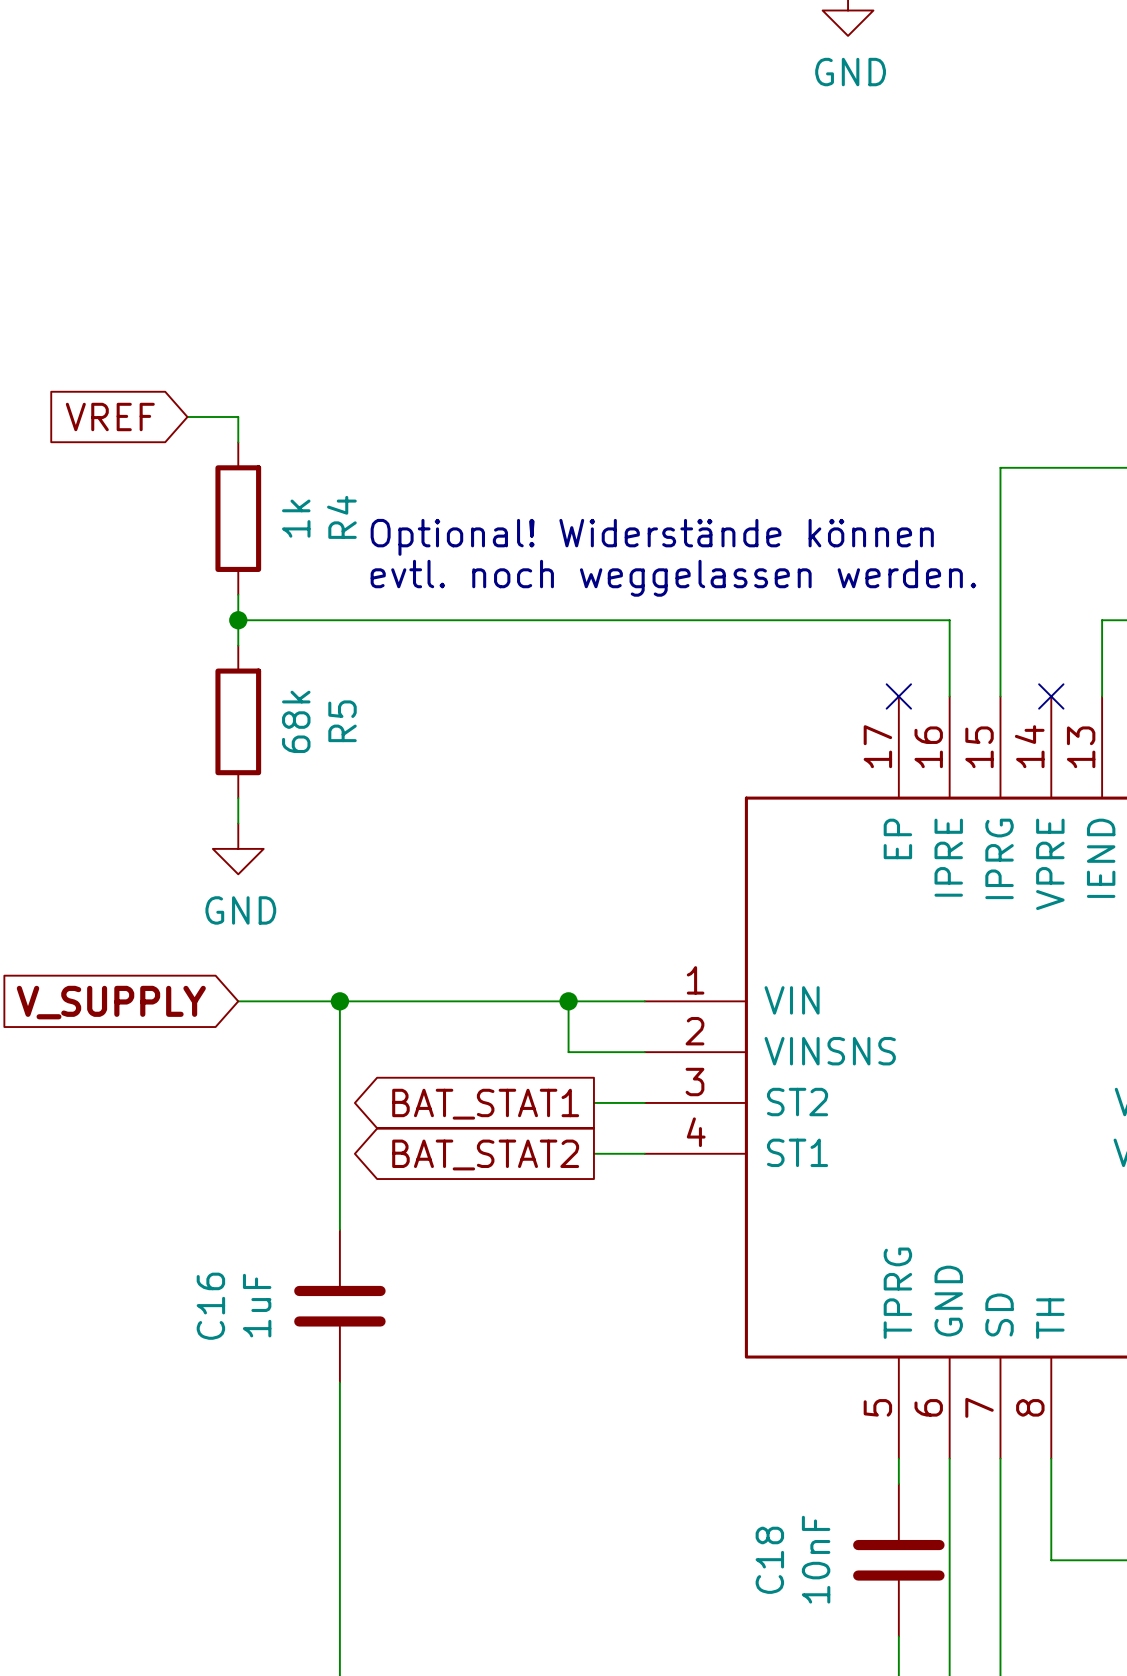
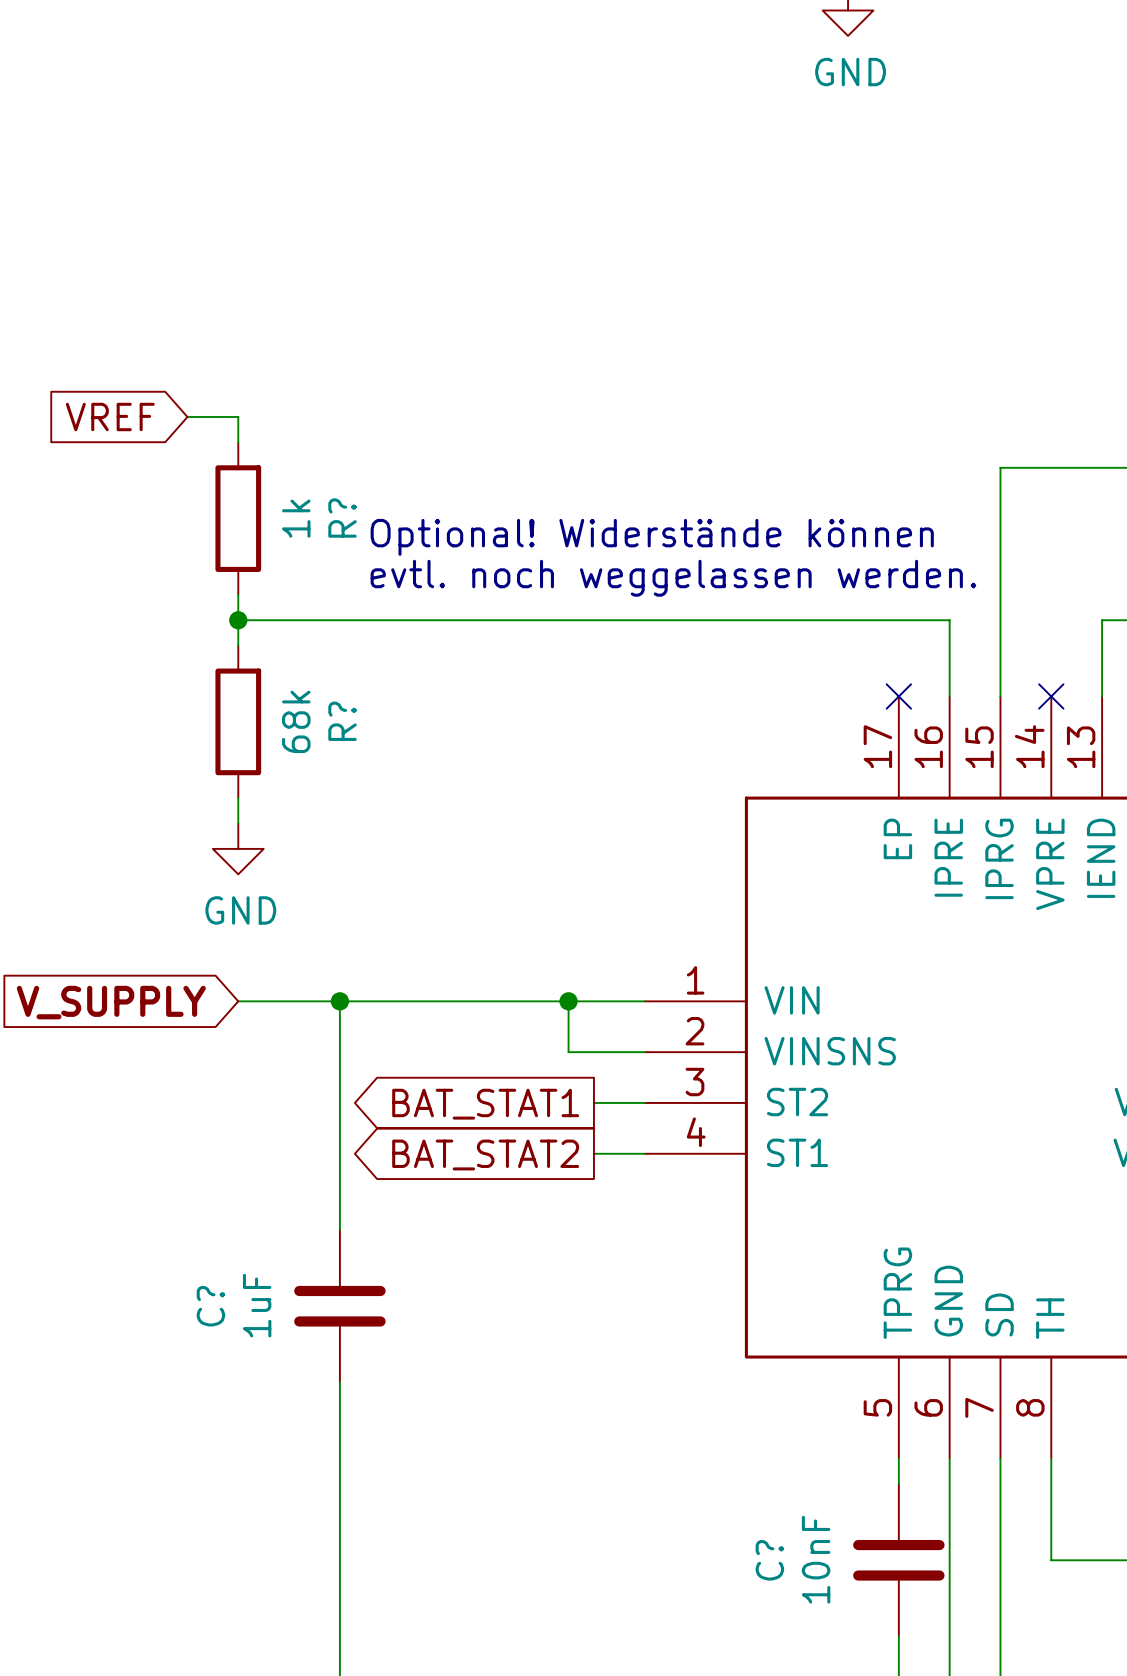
R4 name: R4 (341, 517) -> R? (342, 518)
R5 name: R5 (342, 721) -> R? (342, 721)
C16 name: C16 (210, 1306) -> C? (210, 1306)
C18 name: C18 (769, 1560) -> C? (769, 1560)

